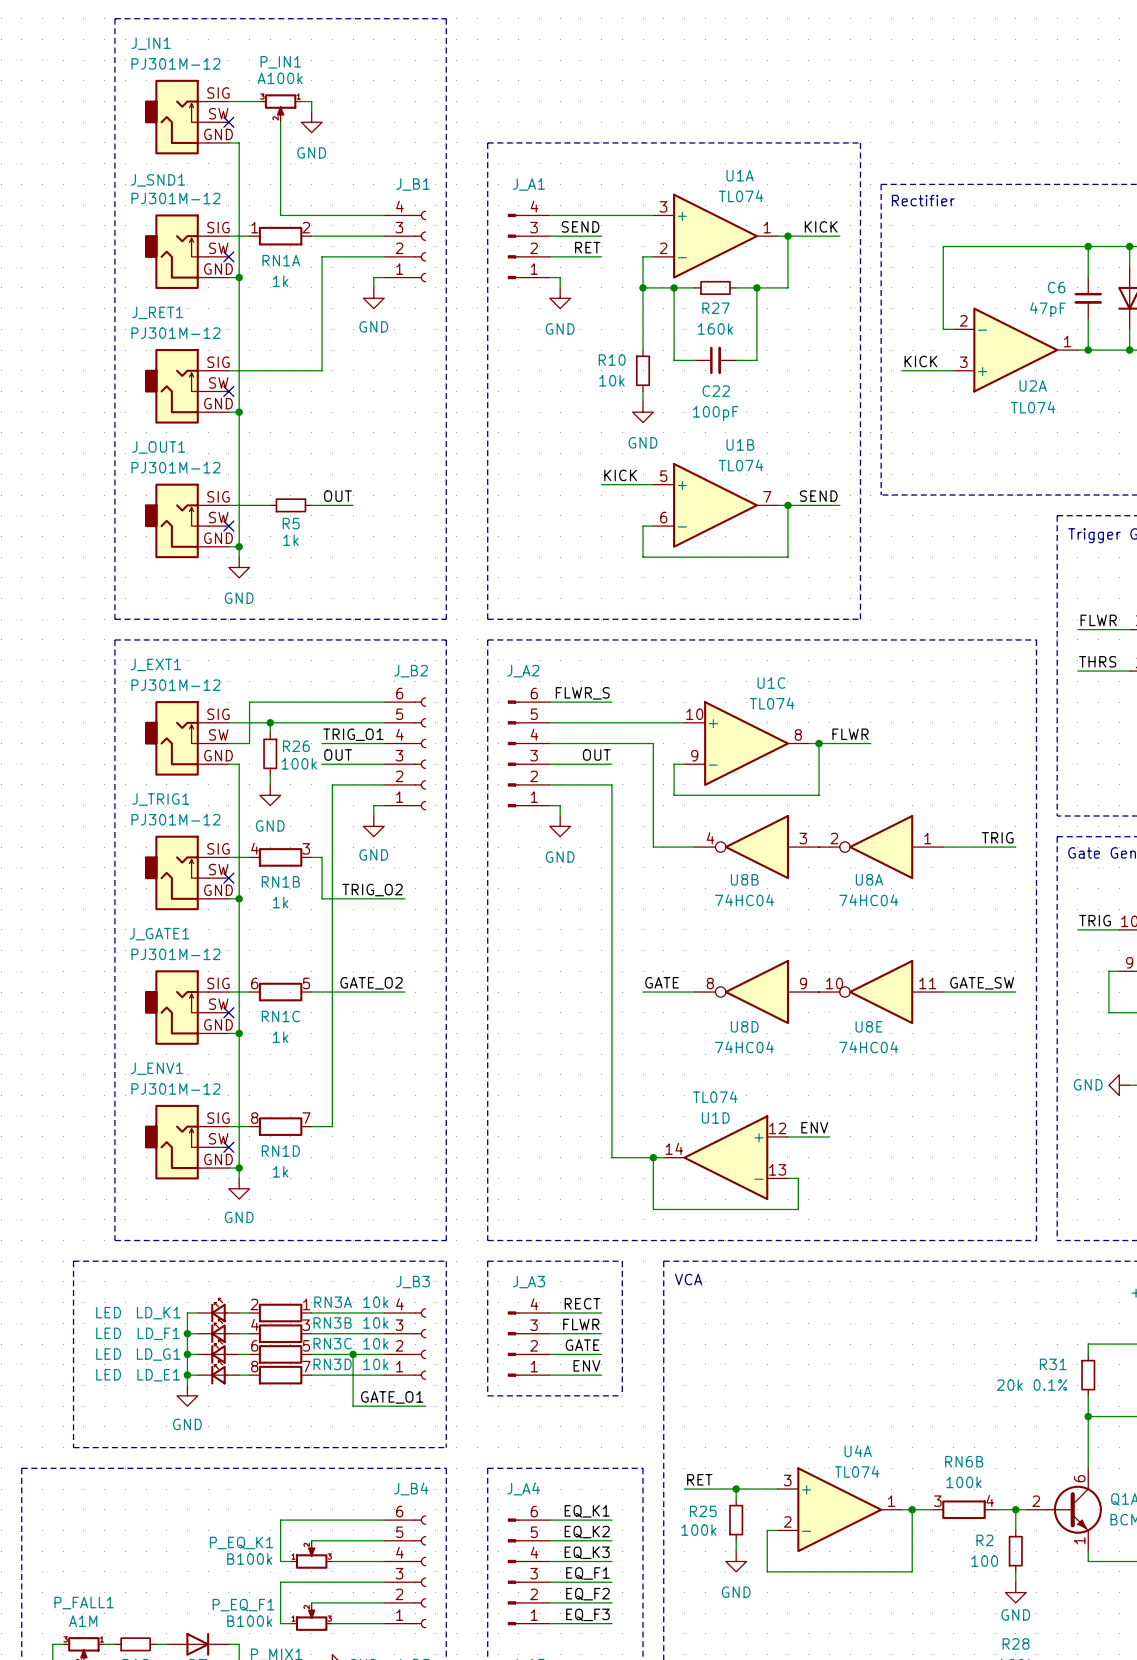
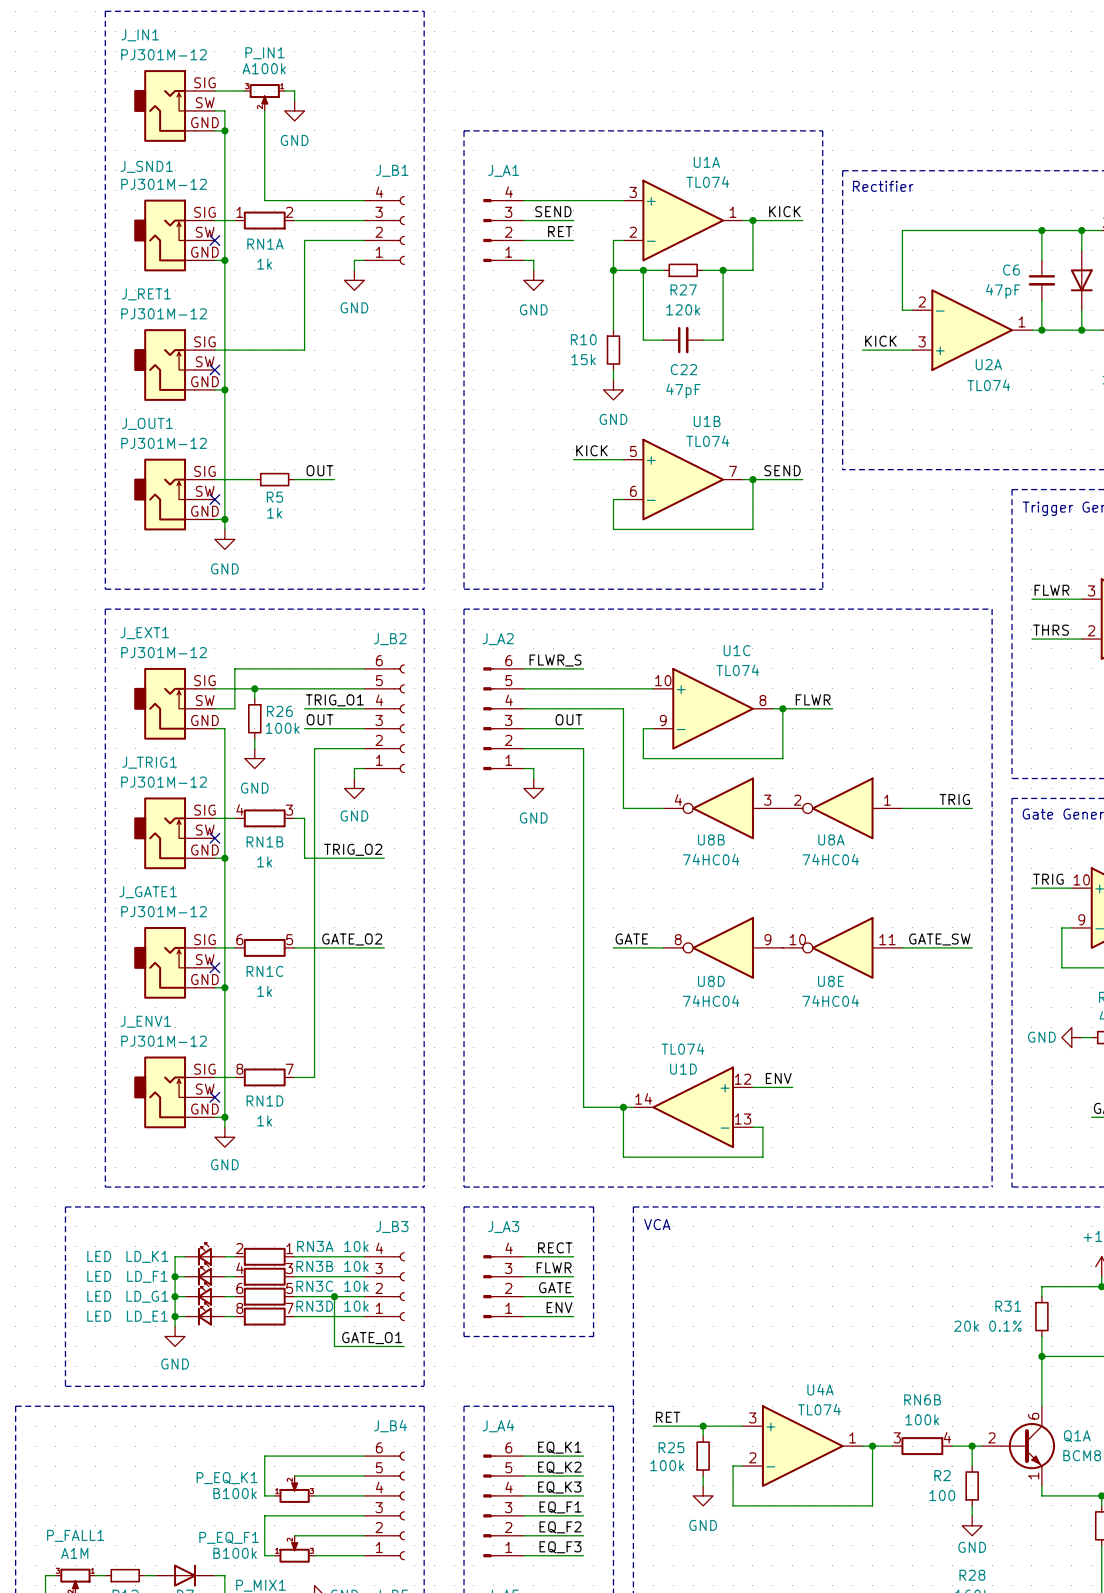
wire: none -> (214, 110) (224, 110) (224, 130)
no-connect mark: (228, 122) -> none
junction: none -> (224, 130)
R27 value: 160k (715, 328) -> 120k (683, 309)
R10 value: 10k (611, 380) -> 15k (583, 359)
C22 value: 100pF (715, 413) -> 47pF (683, 390)

